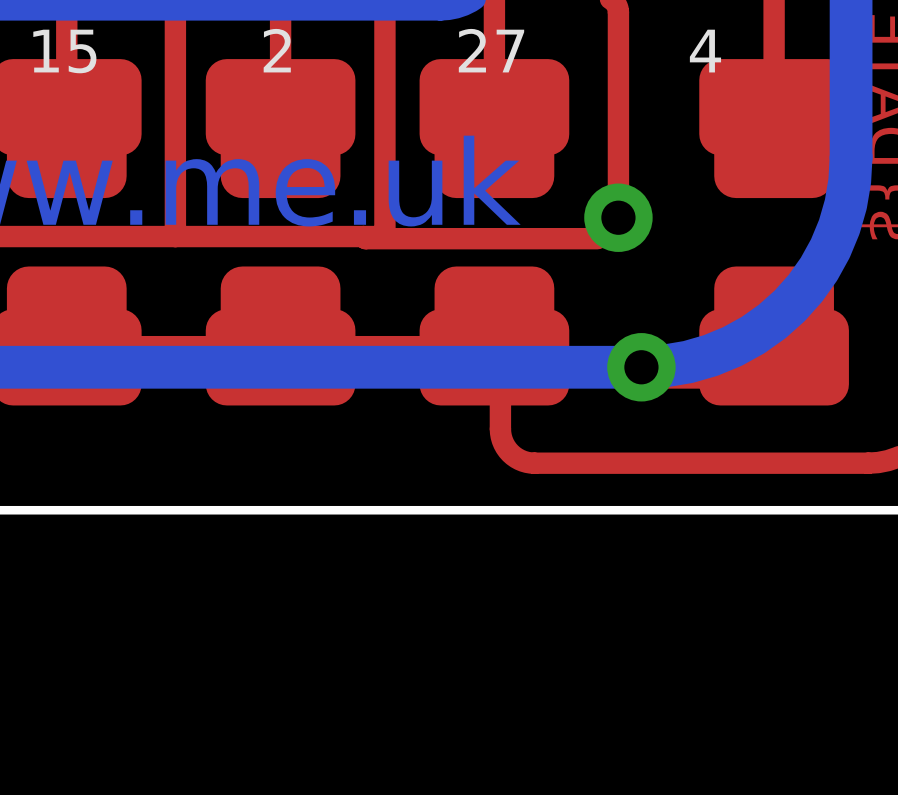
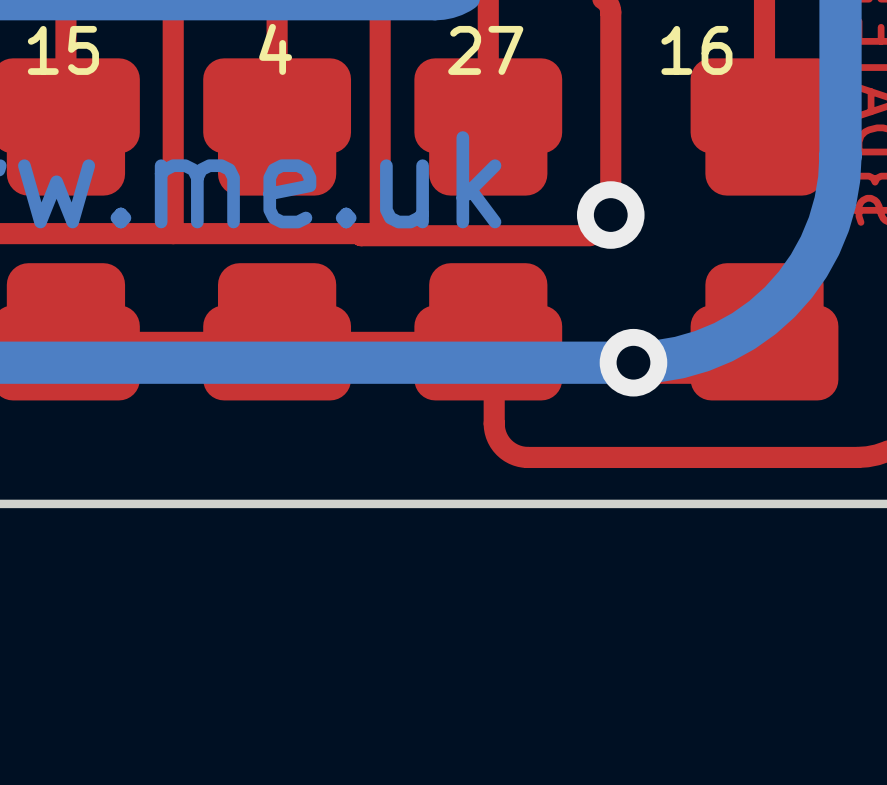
text: 2 (277, 50) -> 4 (275, 49)
text: 4 (705, 51) -> 16 (696, 50)

